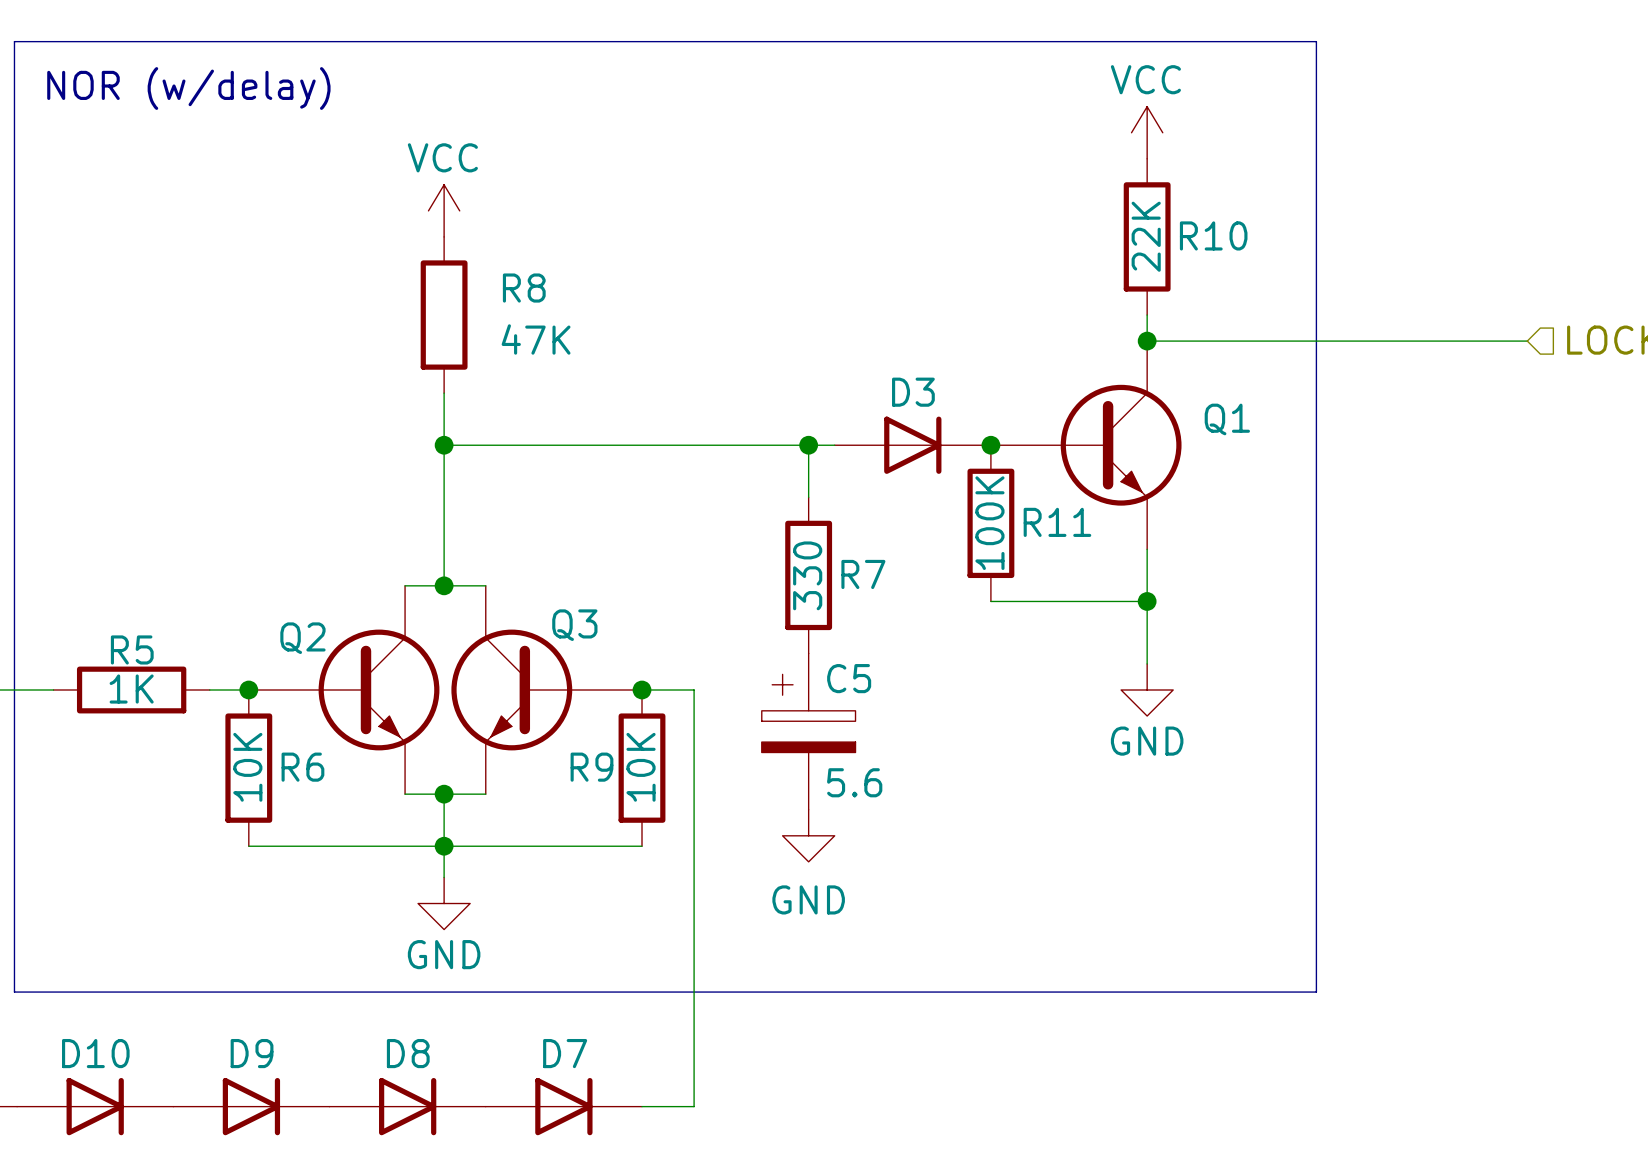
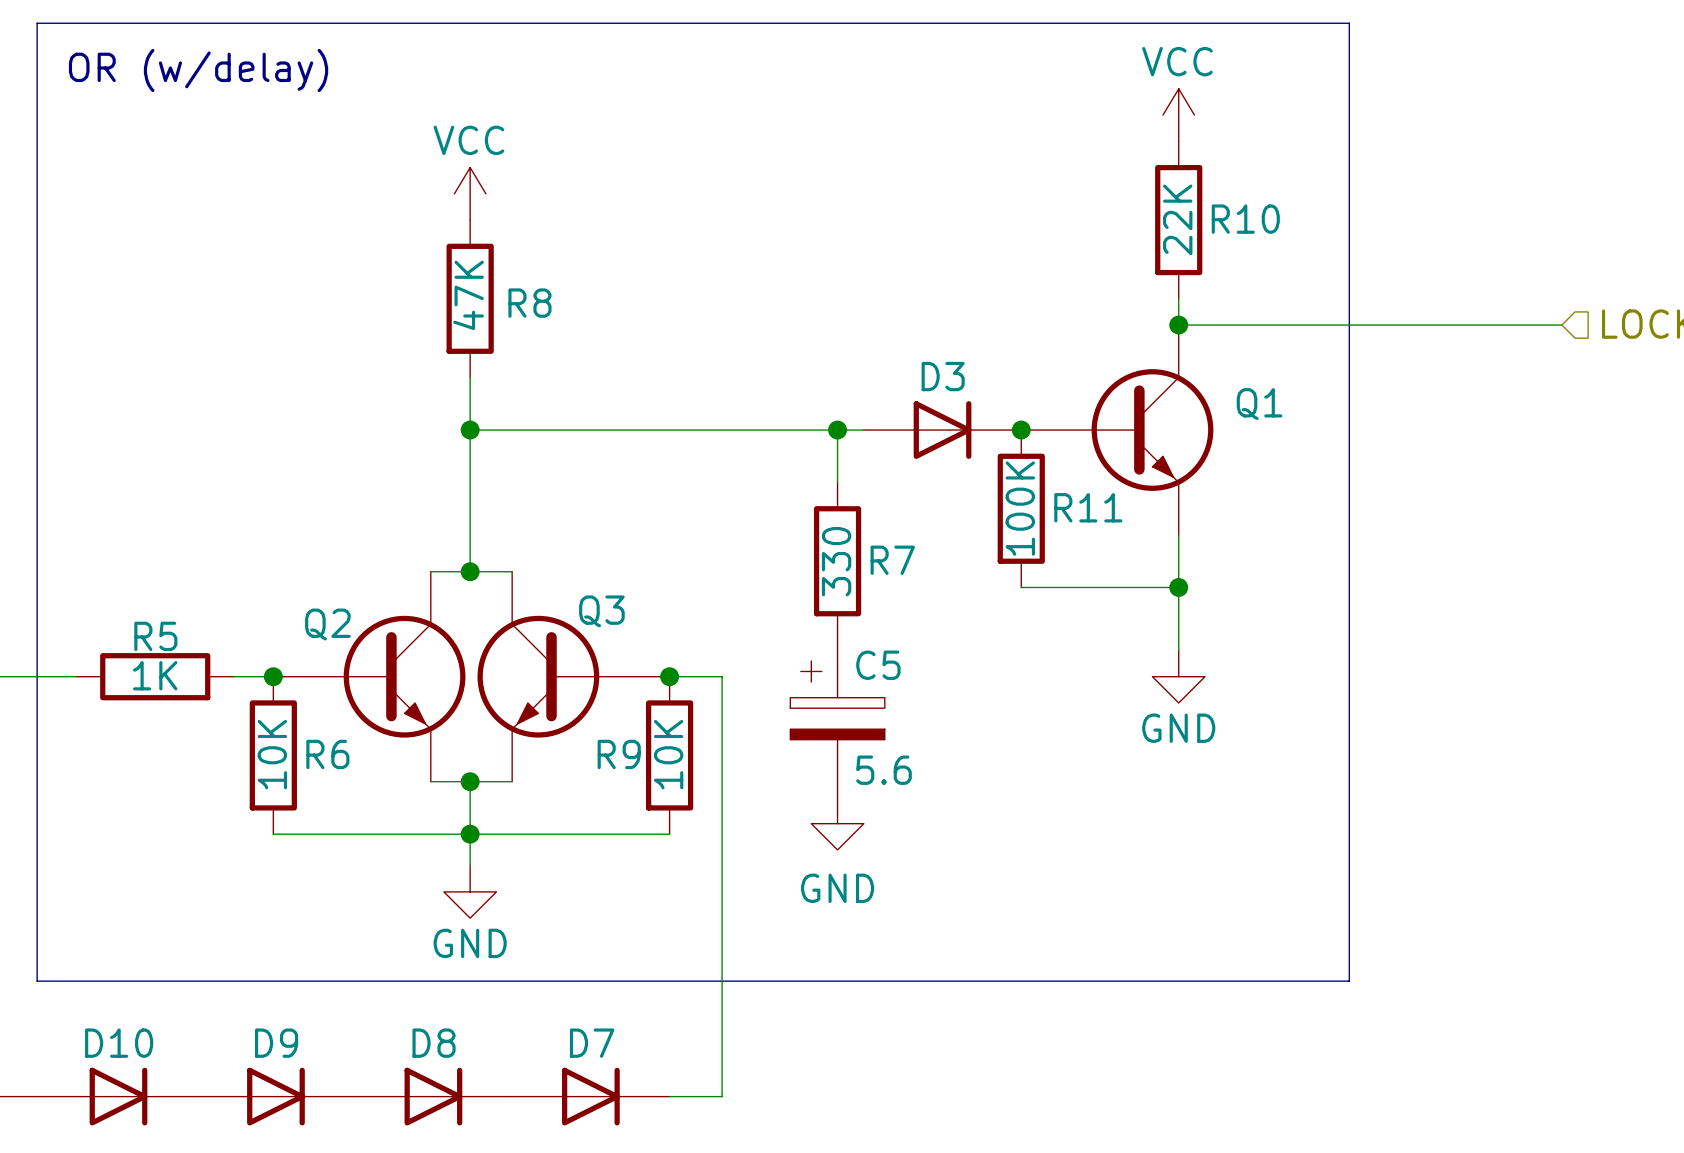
text: NOR (w/delay) (188, 88) -> OR (w/delay) (198, 70)
R8 name position: R8 (524, 288) -> R8 (529, 303)
R8 value rotation: 0° (536, 339) -> 90° counterclockwise (468, 295)
R8 value position: 47K (536, 339) -> 47K (468, 295)

